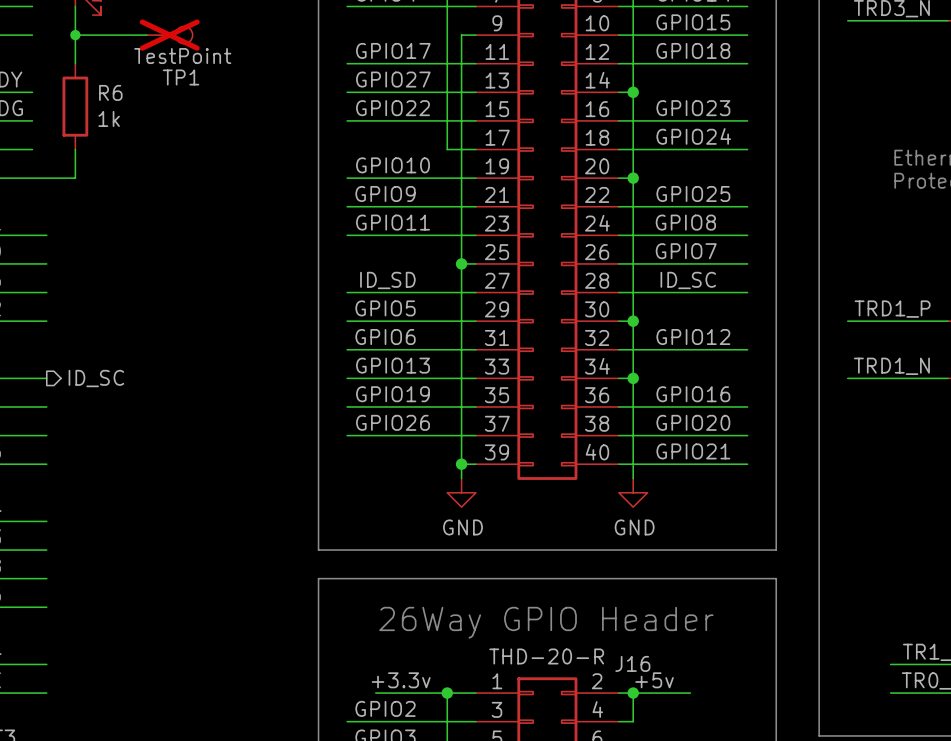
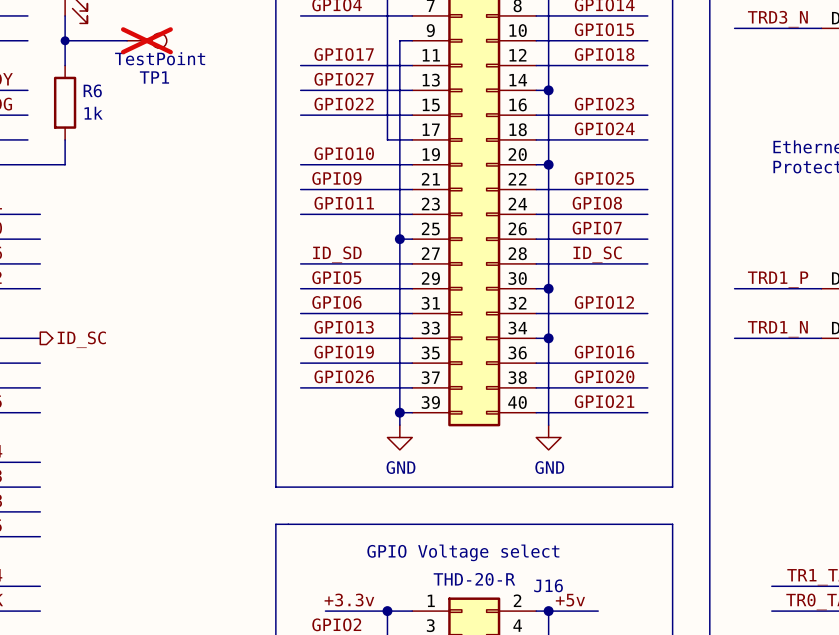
line: (318, 592) (318, 578) (776, 578) (776, 592) -> (275, 524) (672, 524)
text: 26Way GPIO Header (546, 622) -> none
text: none -> GPIO Voltage select (463, 552)

